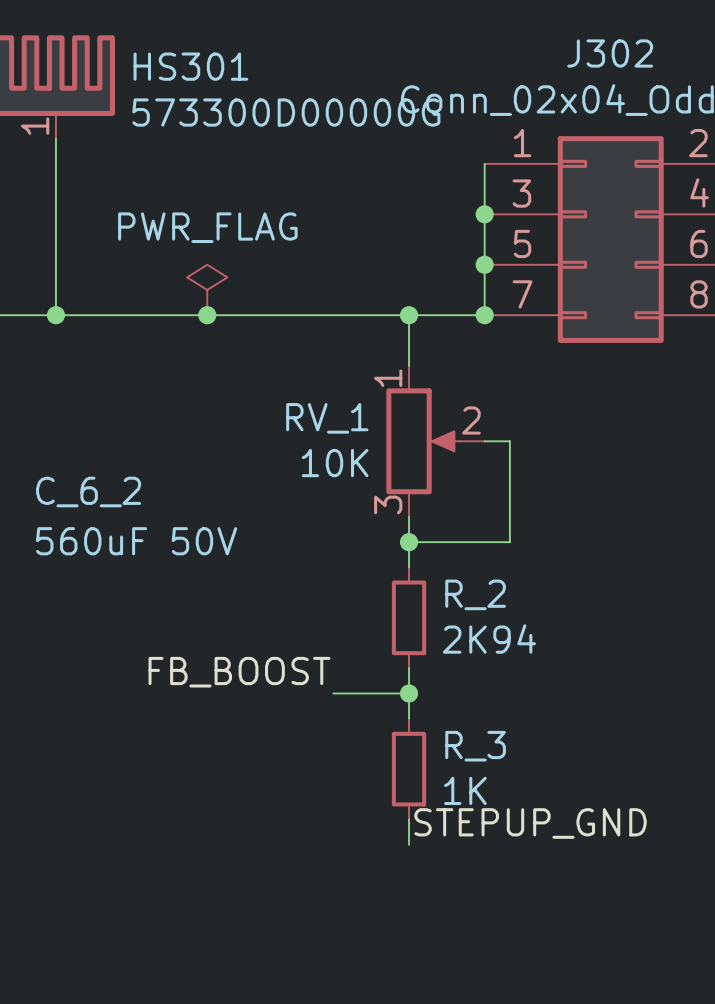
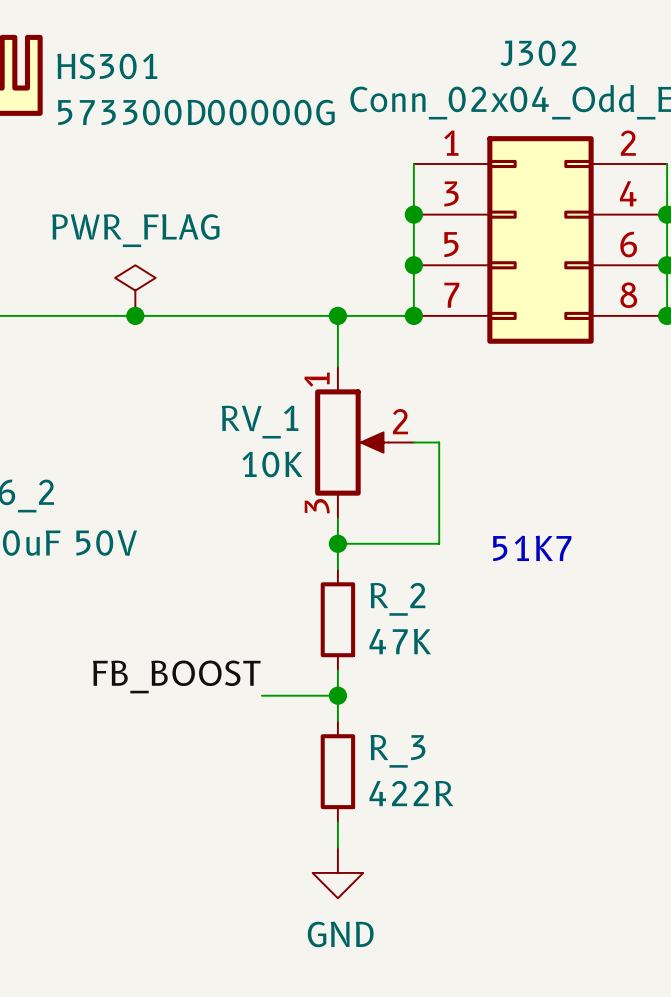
text: none -> 51K7 (532, 548)
R_2 value: 2K94 (489, 638) -> 47K (400, 641)
R_3 value: 1K (465, 790) -> 422R (411, 793)
label: STEPUP_GND (530, 823) -> none
power symbol: none -> GND (337, 872)

